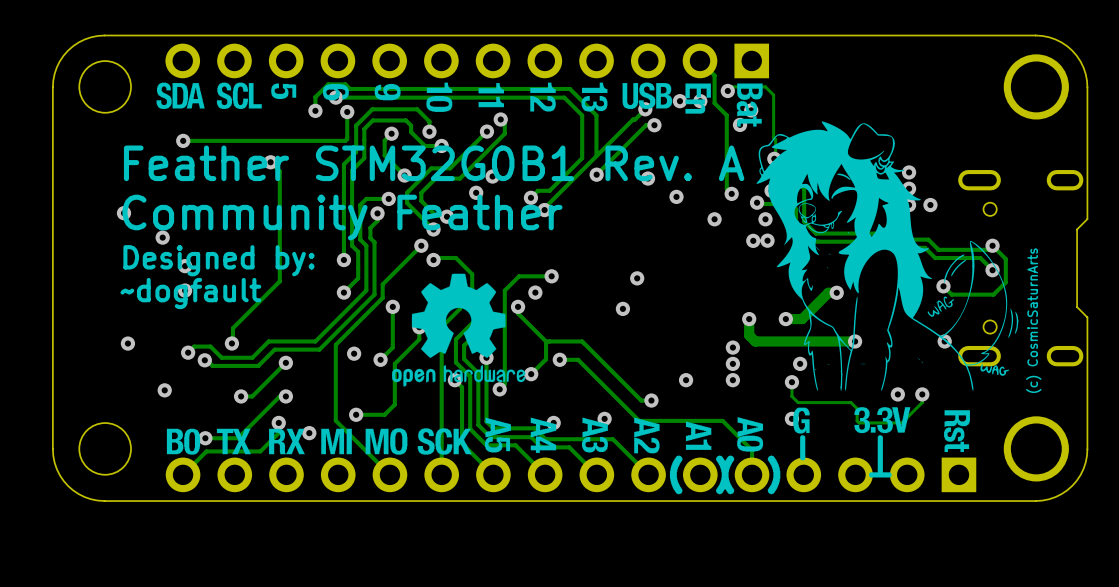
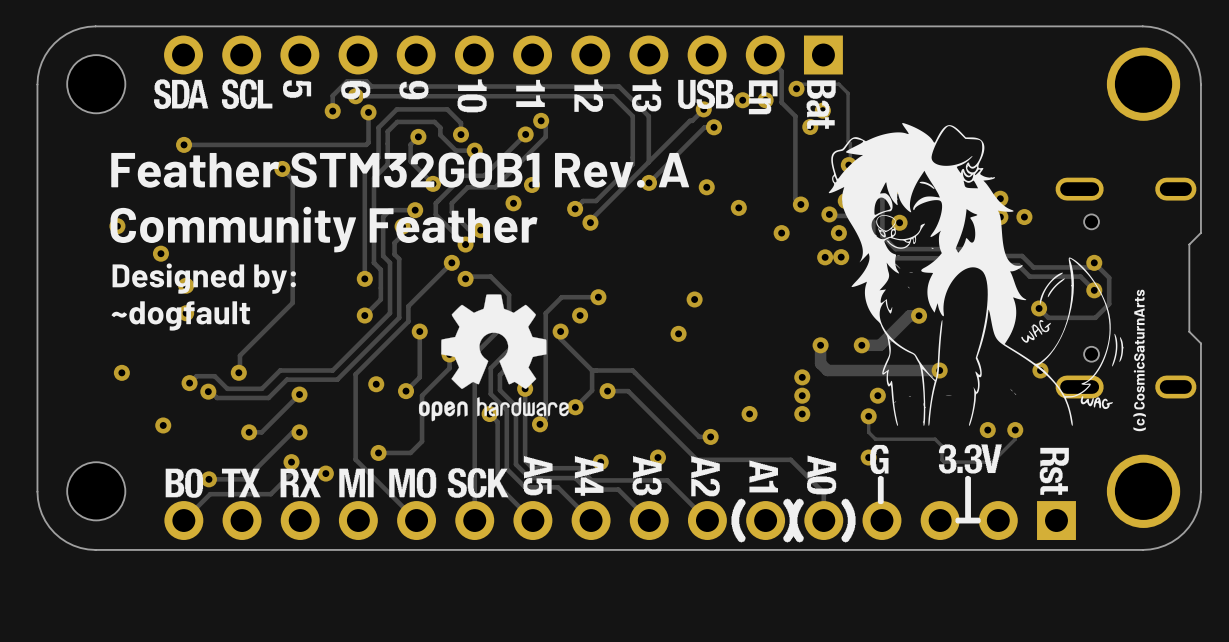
via: (909, 172) -> none
via: none -> (899, 222)

